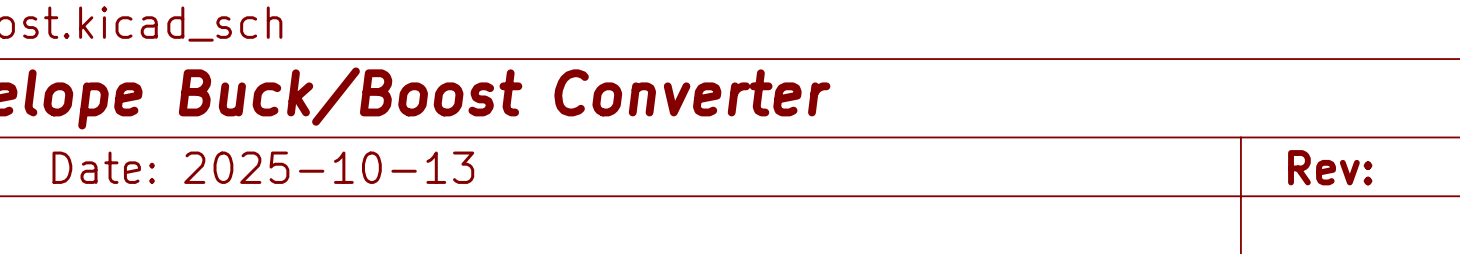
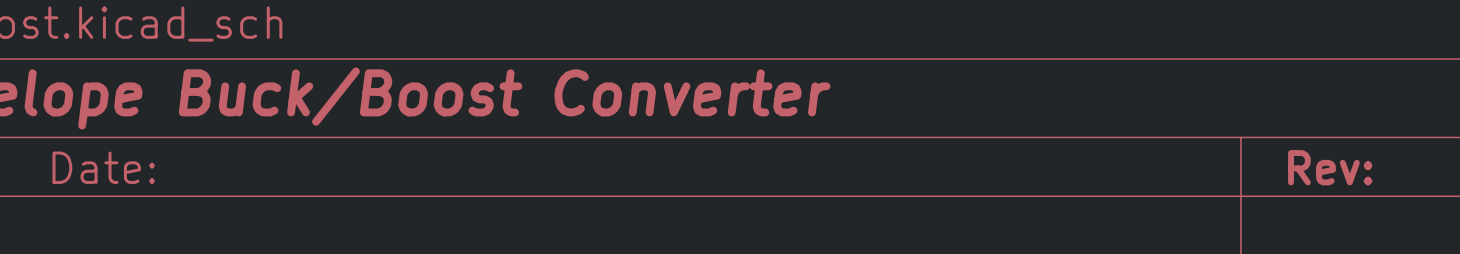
title block: Date: 2025-10-13 (263, 167) -> Date: (103, 167)

